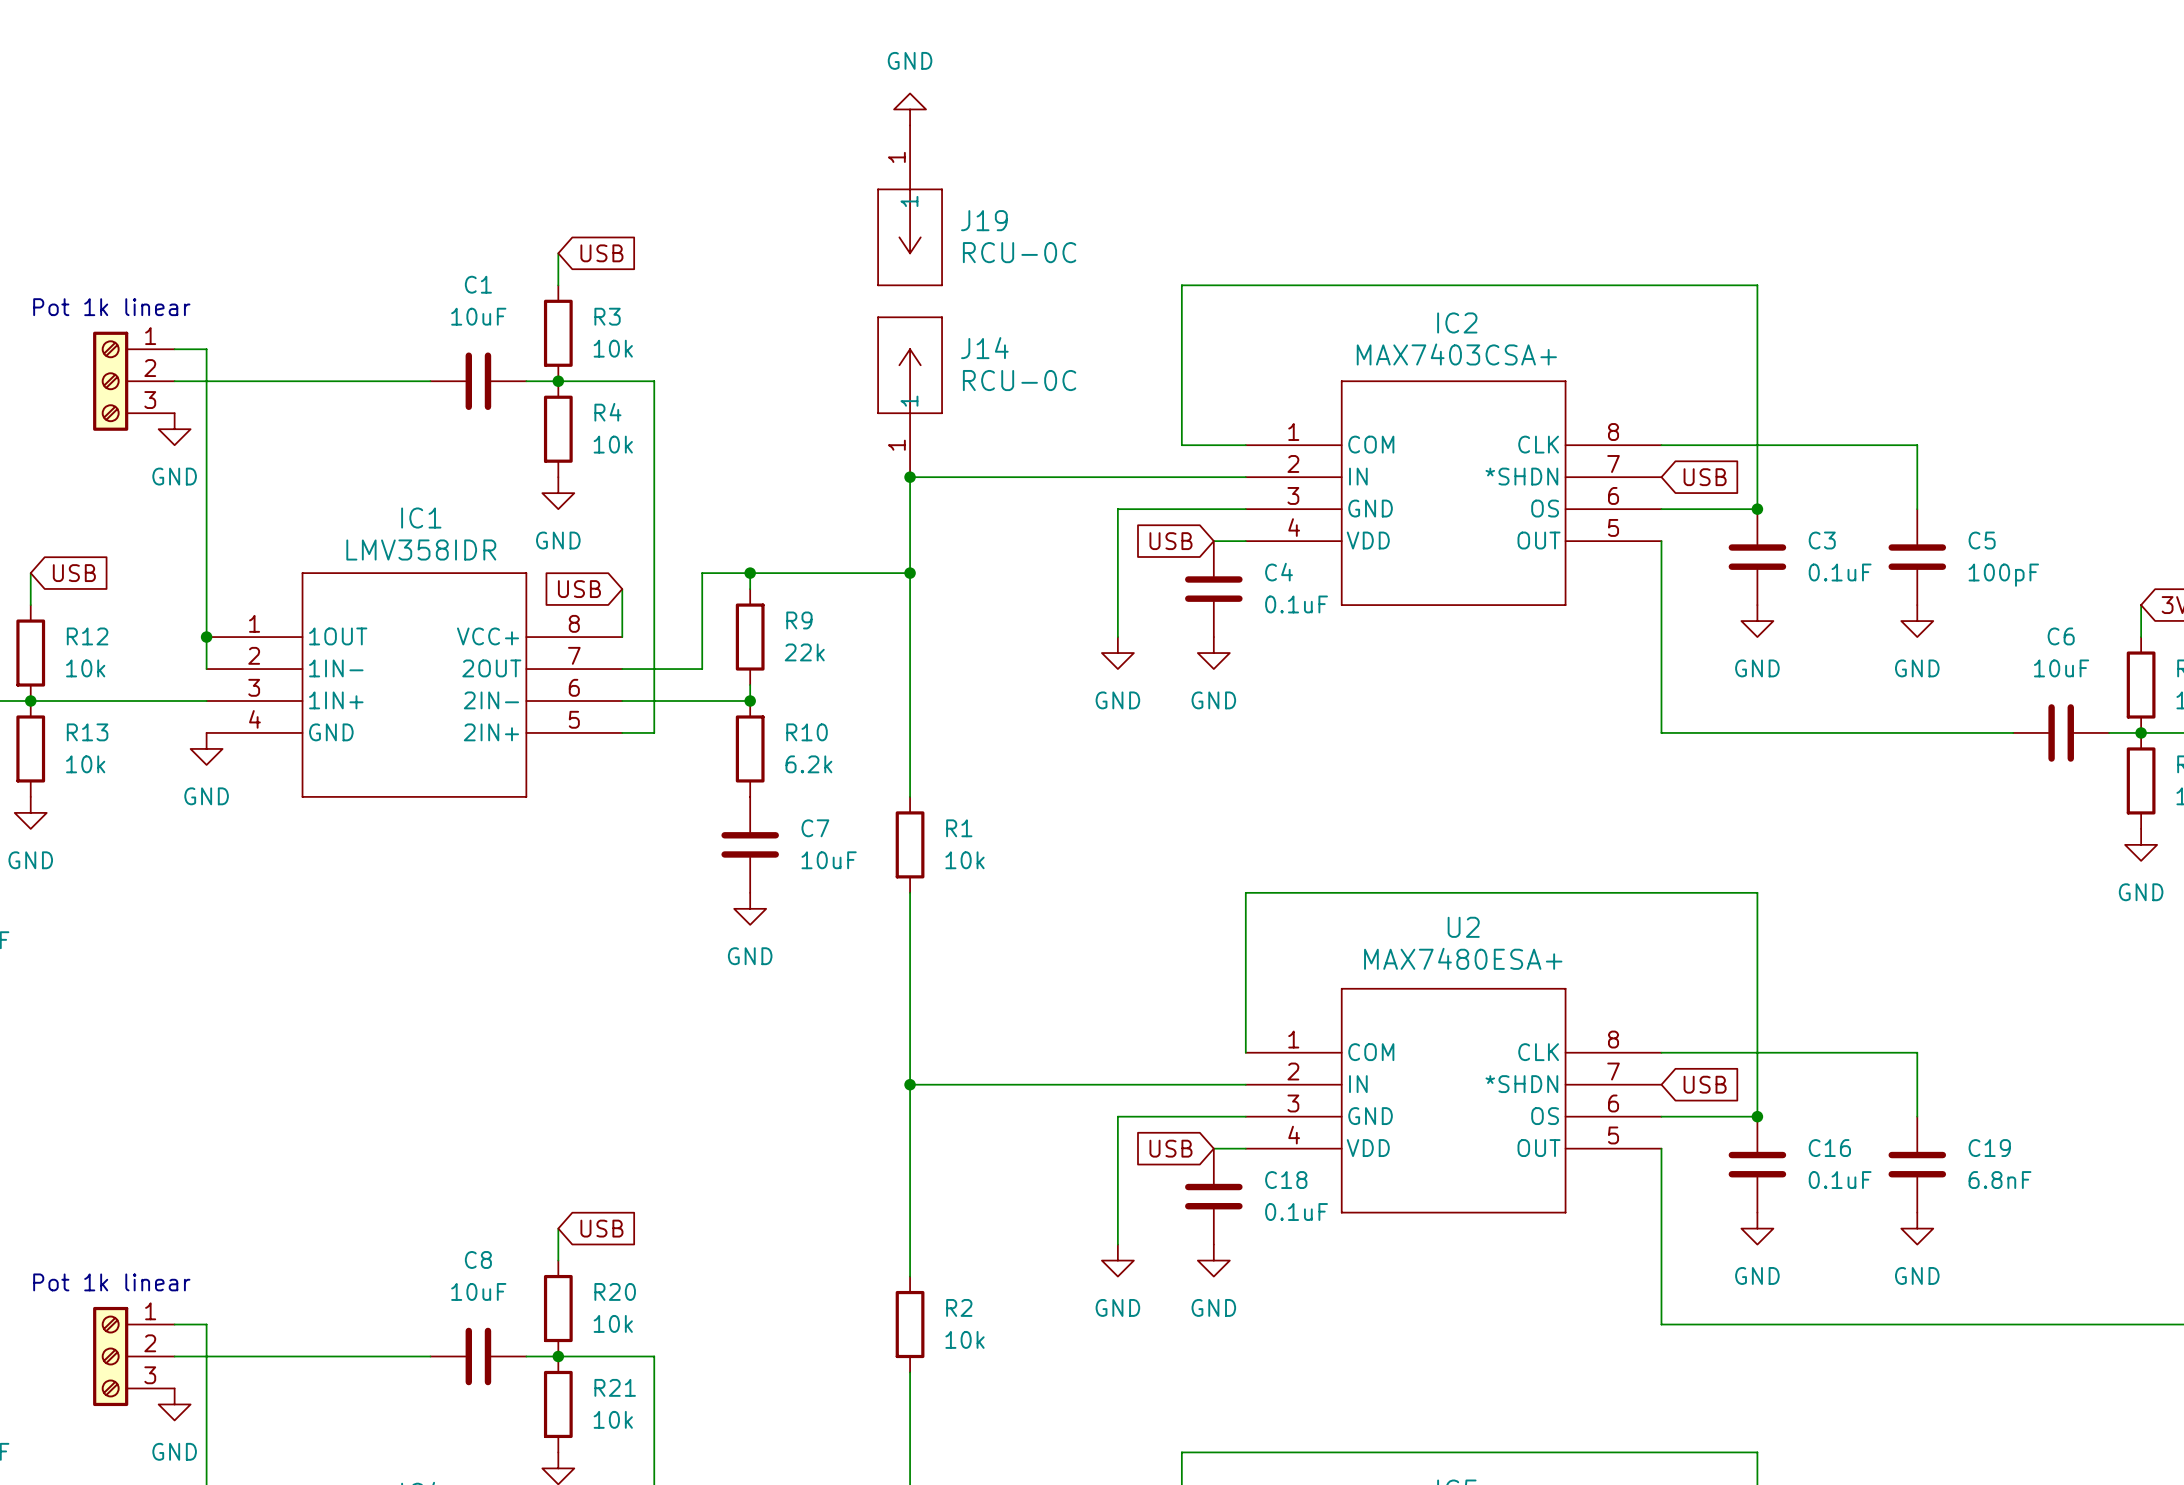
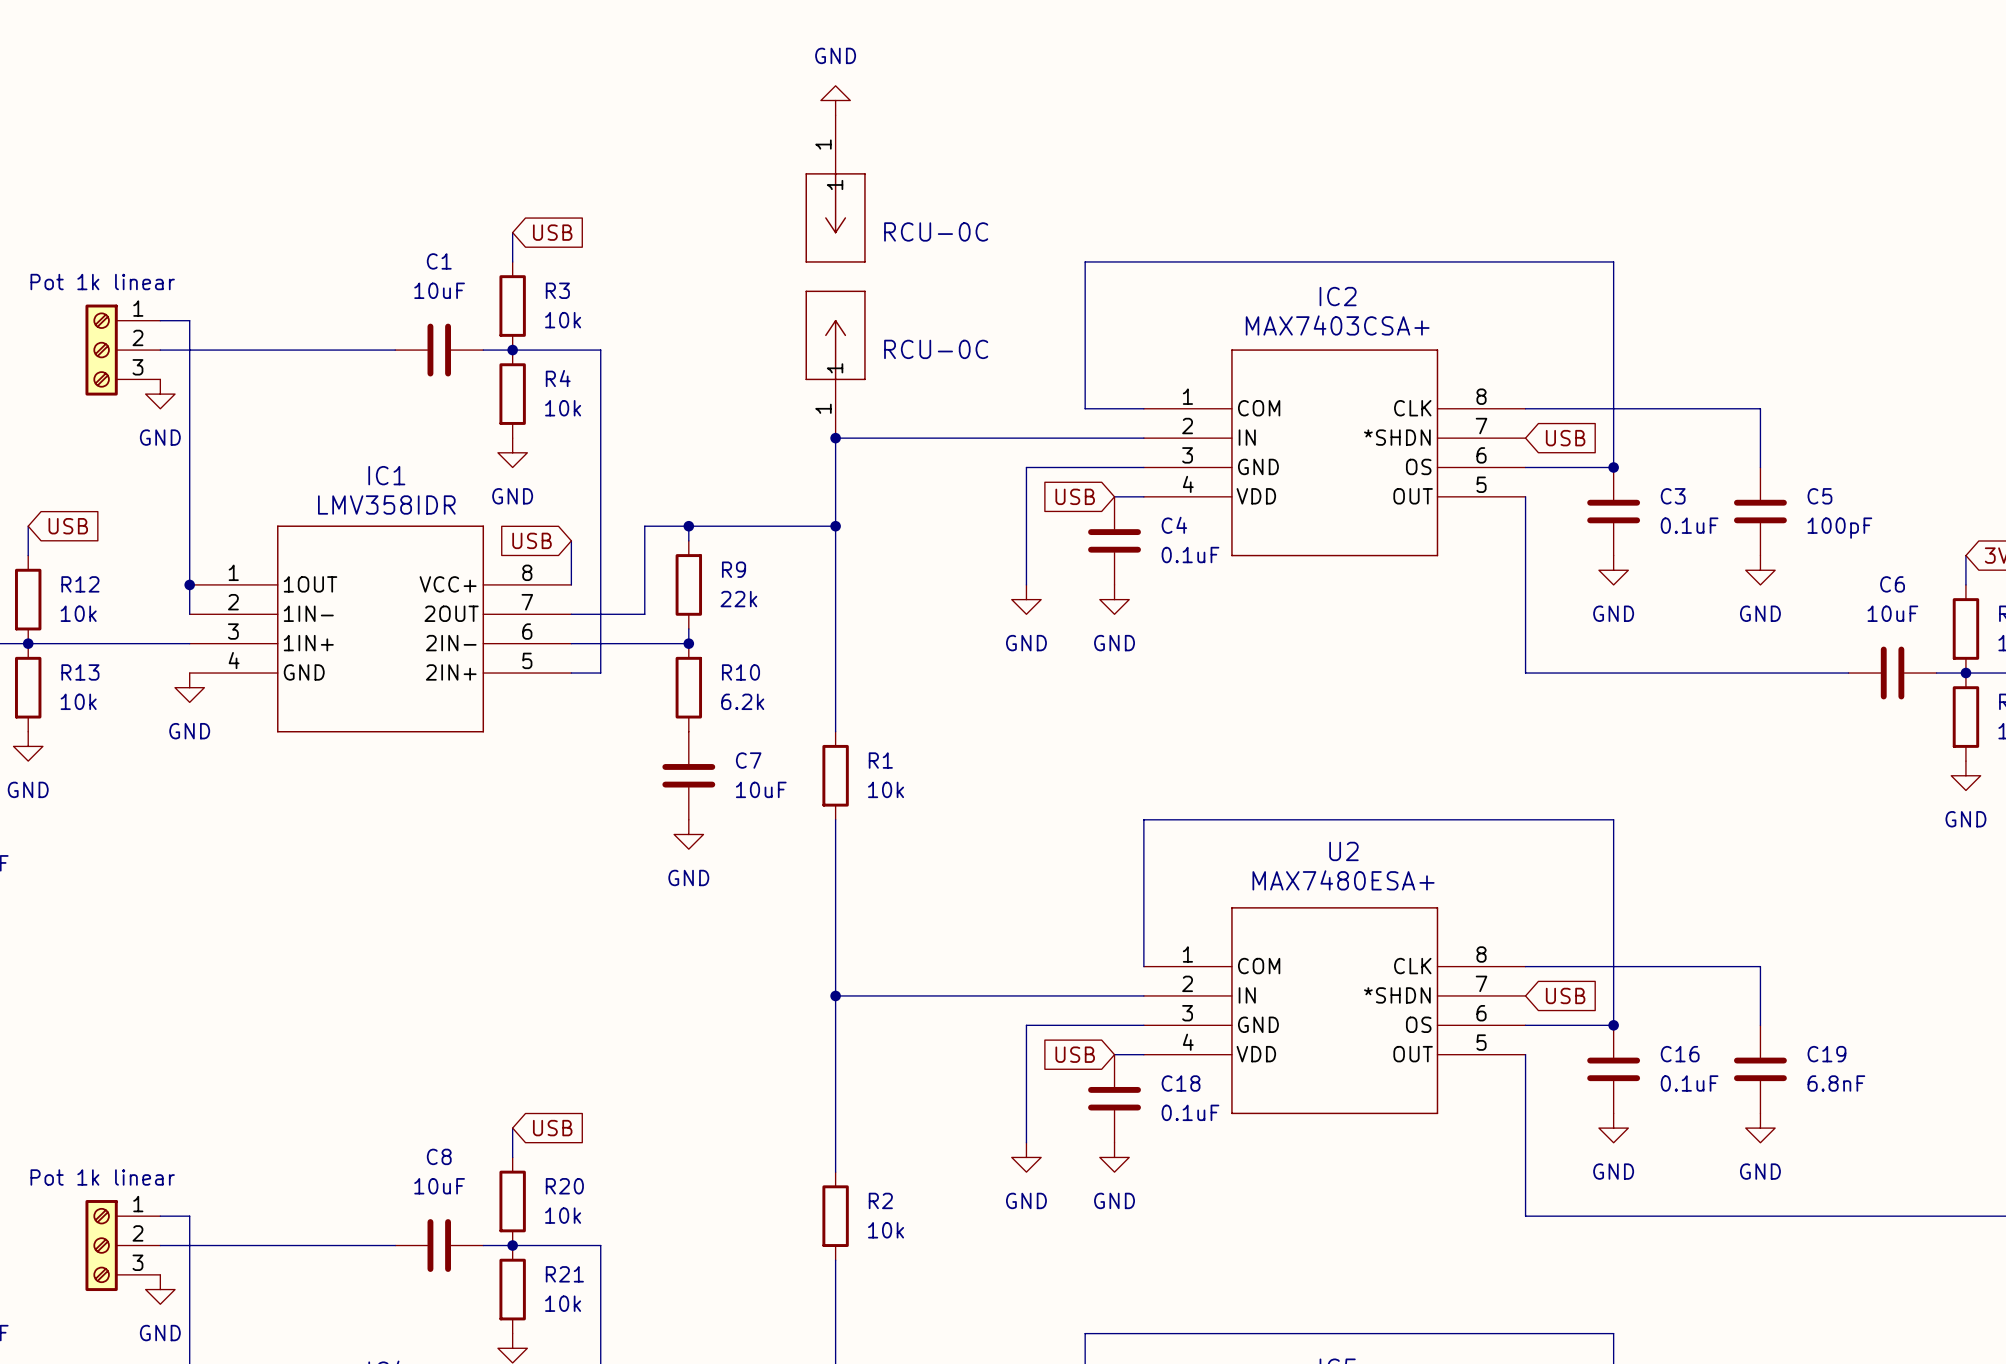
J19 name: J19 (984, 220) -> none
J14 name: J14 (984, 348) -> none

